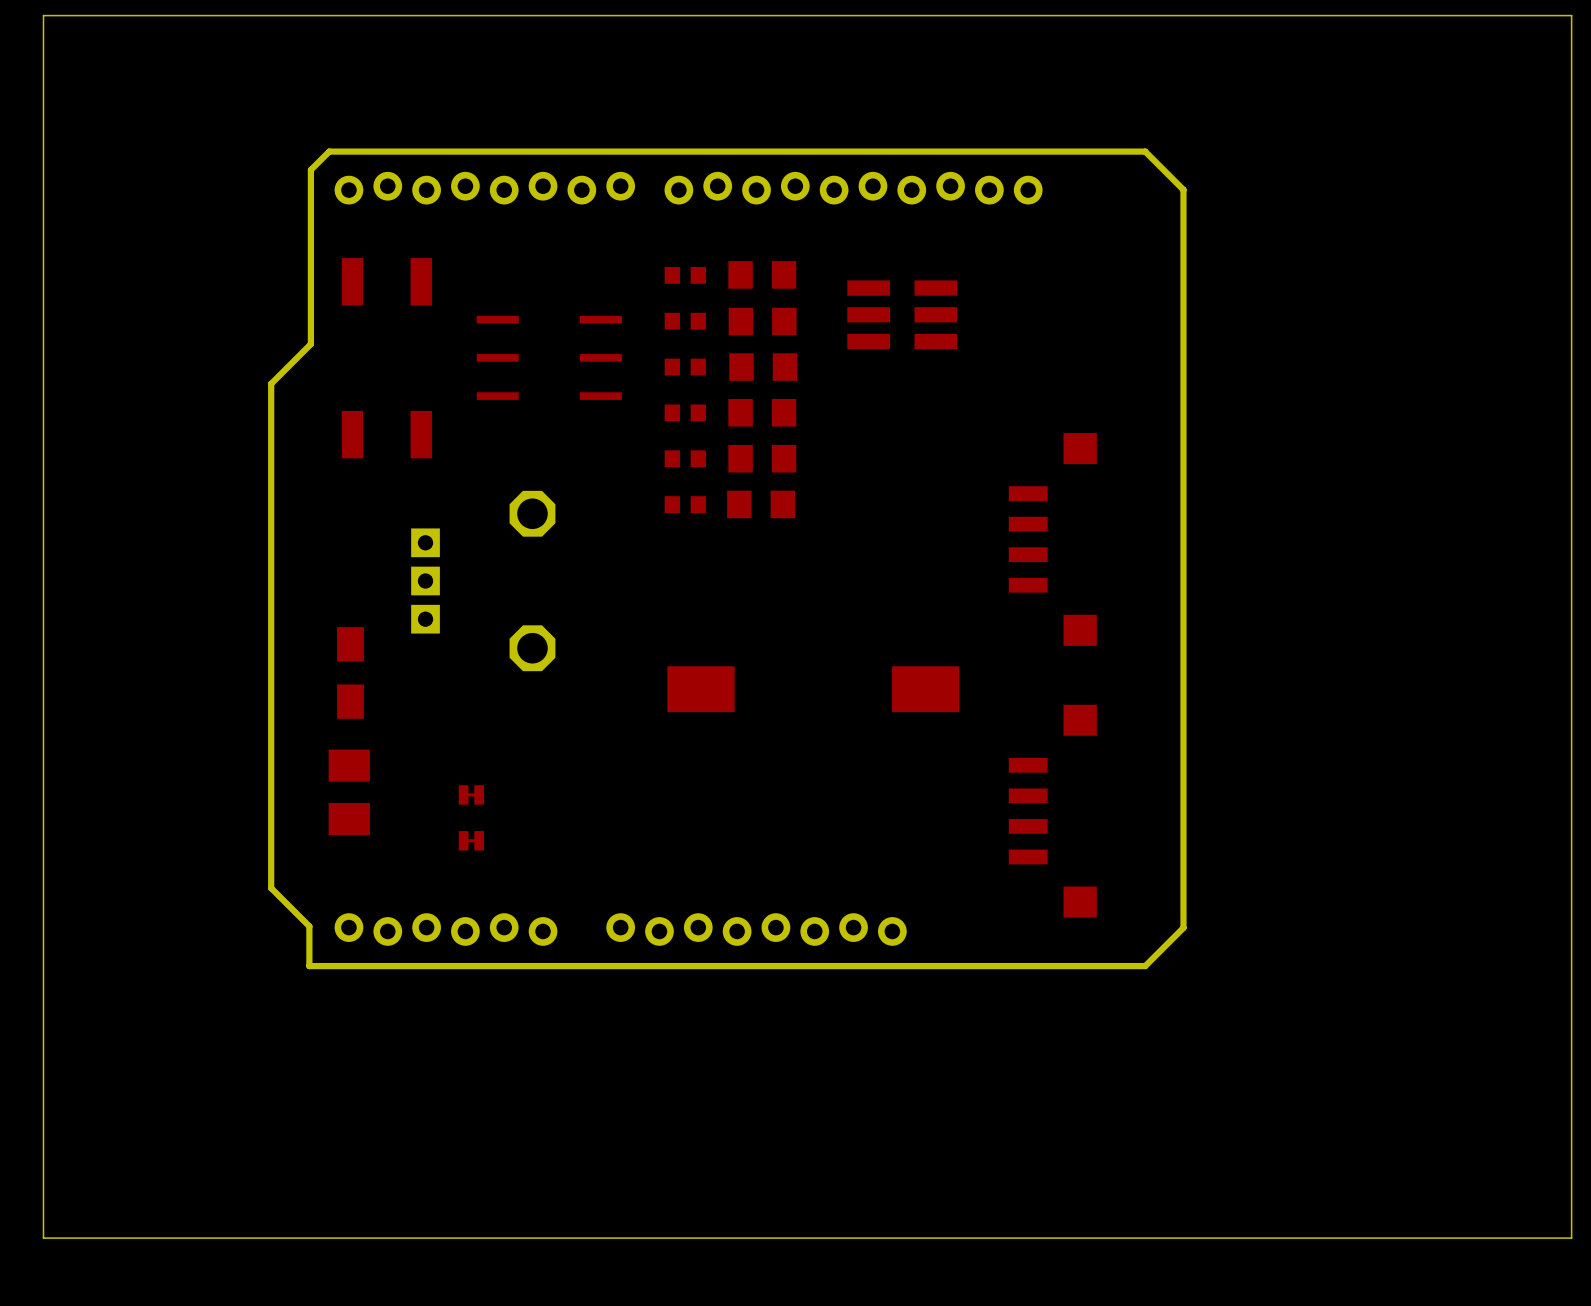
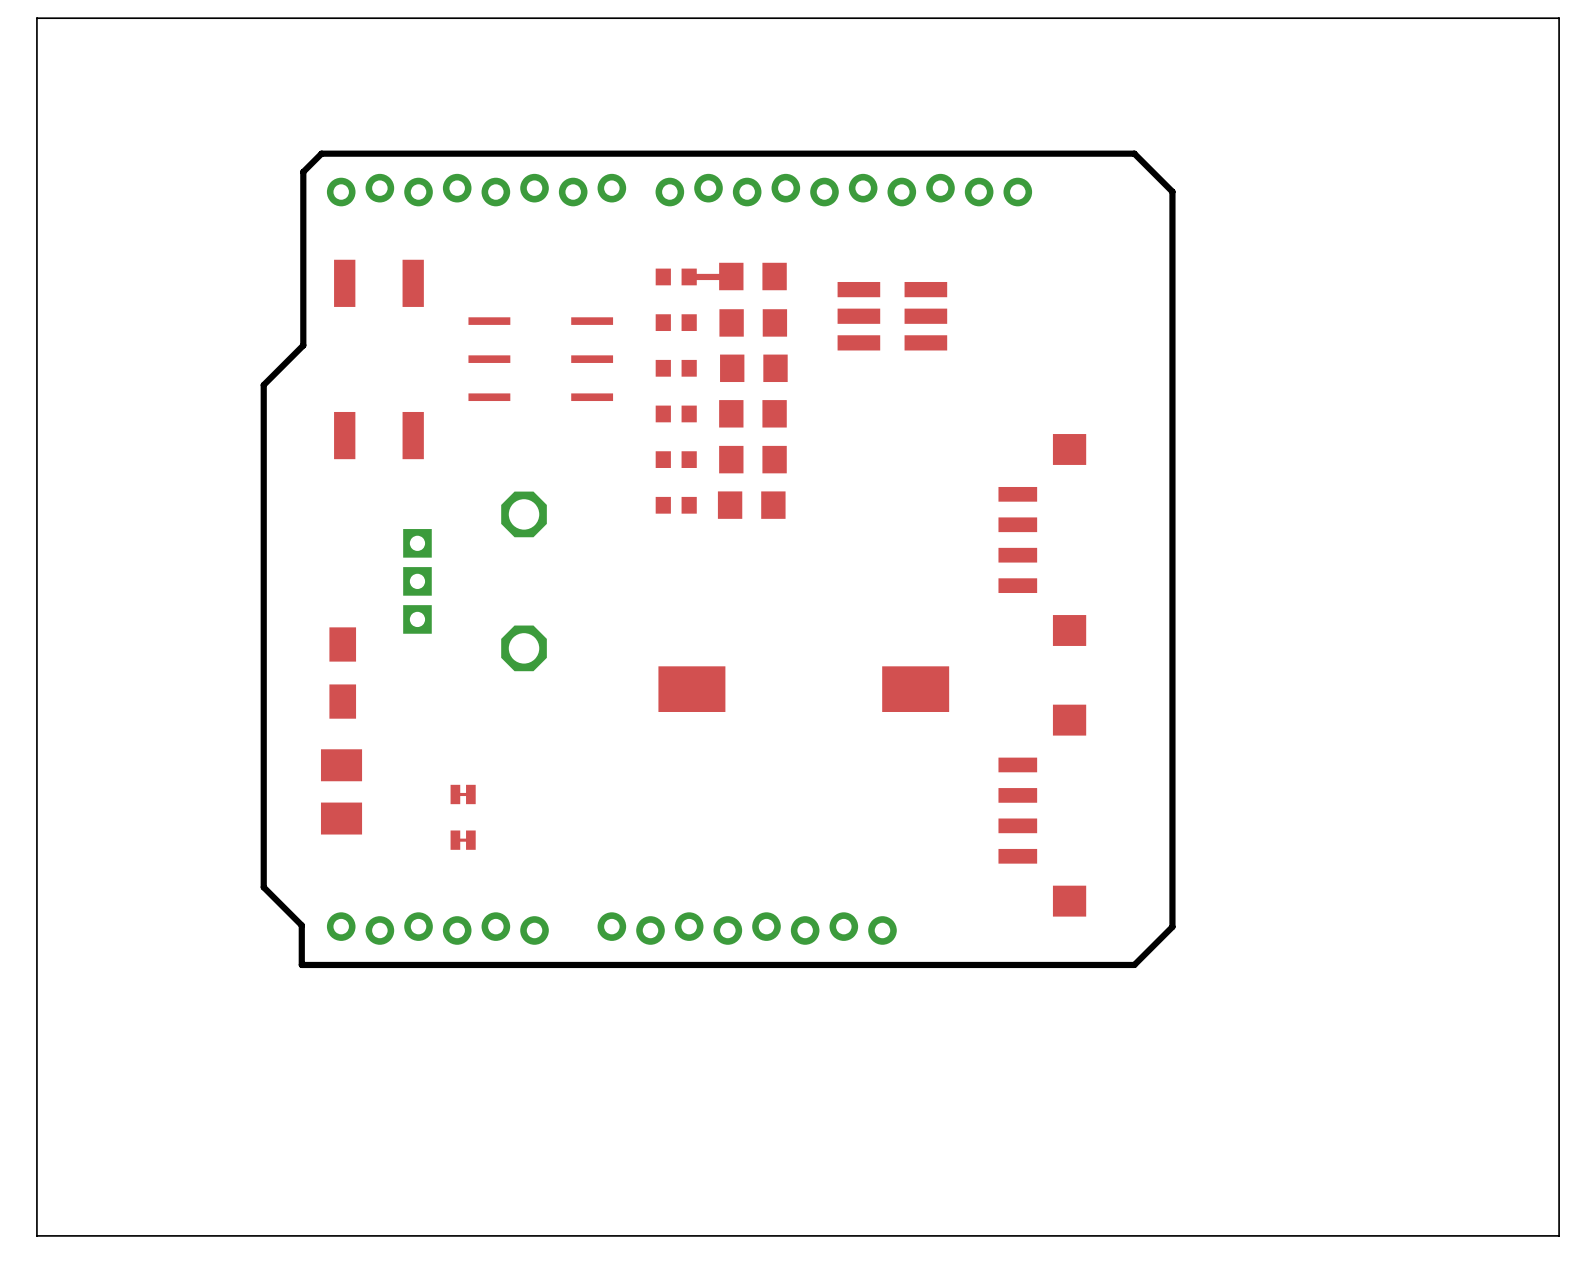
top track: none -> (730, 276) (689, 276)

